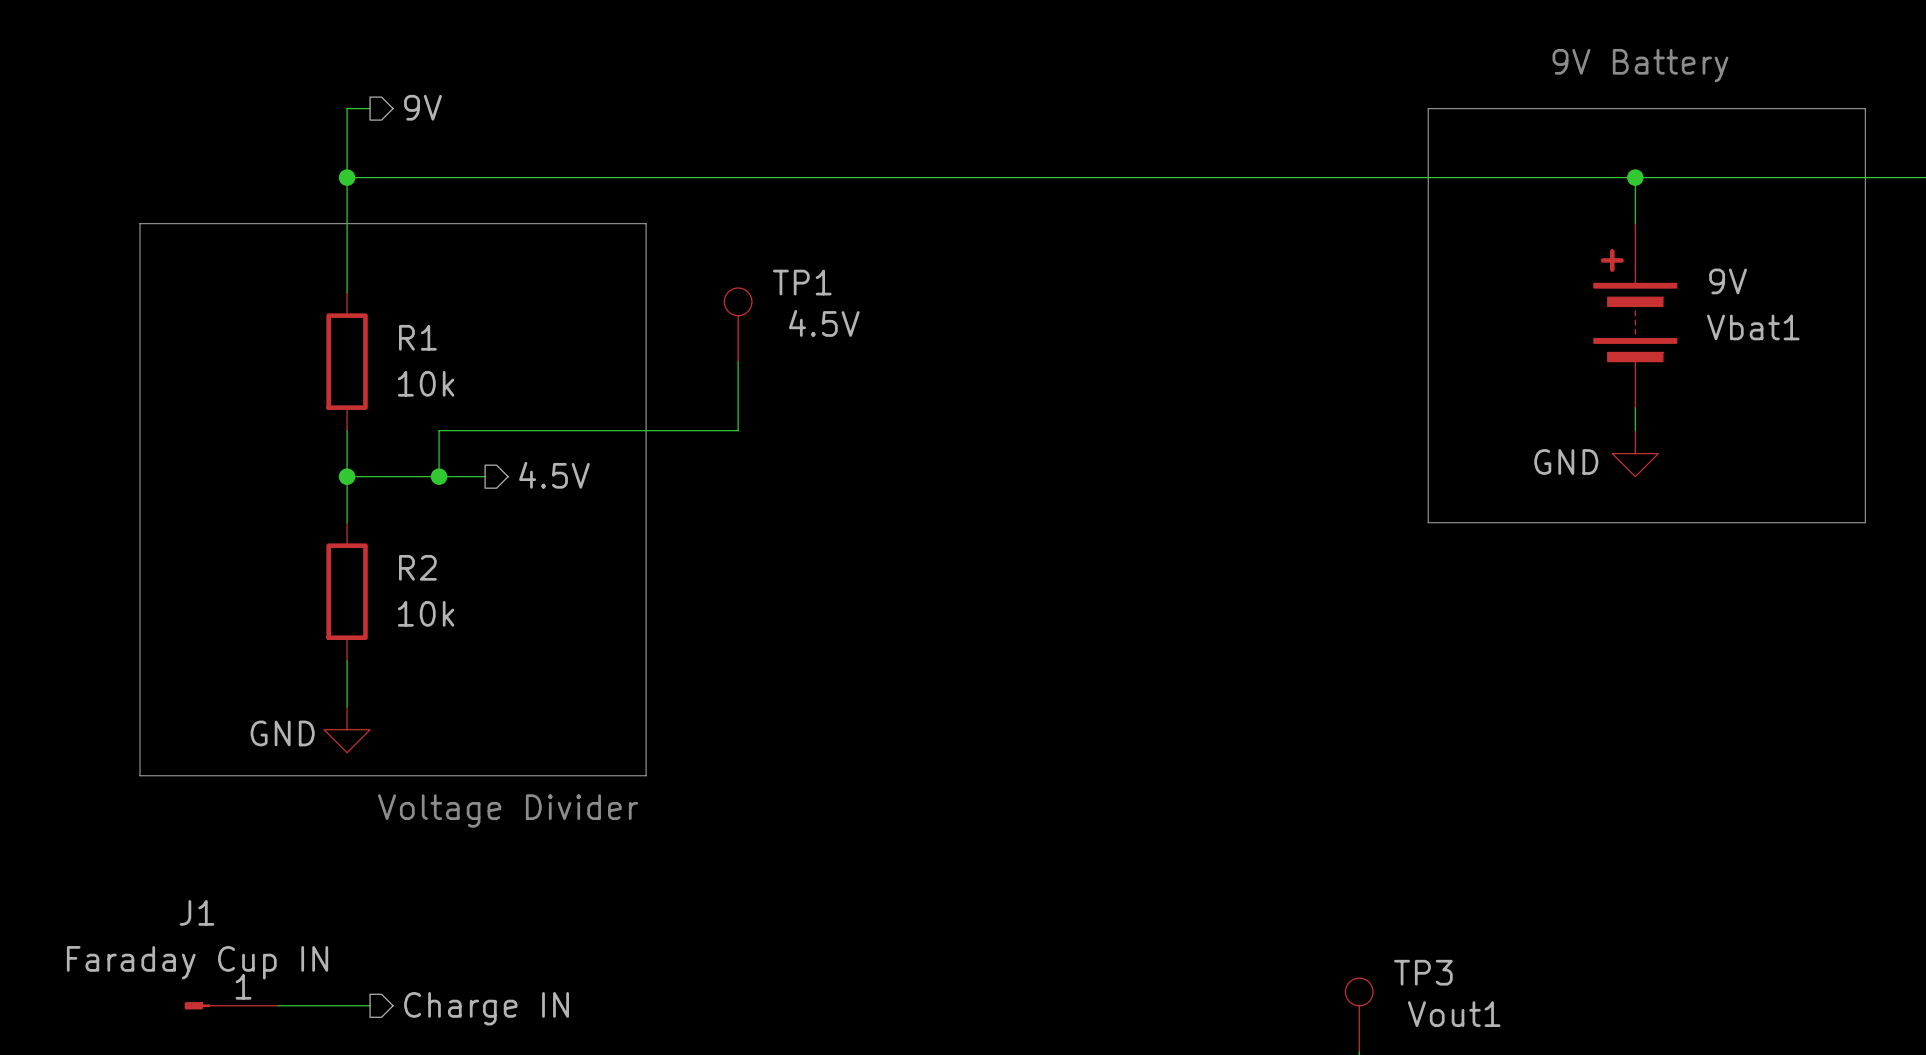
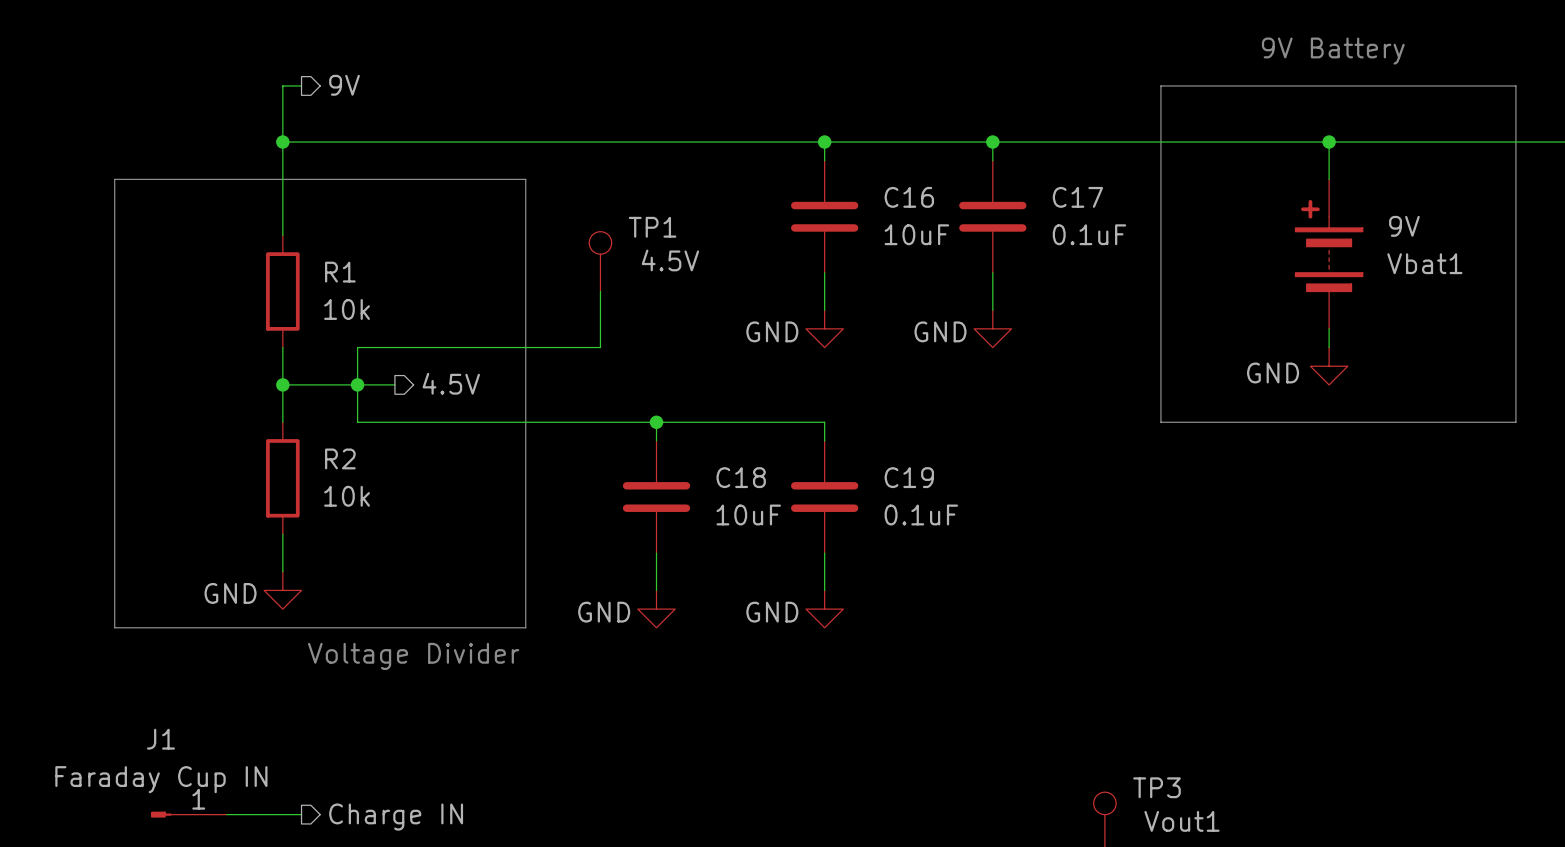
wire: none -> (824, 142) (824, 160)
junction: none -> (824, 142)
wire: none -> (992, 142) (992, 160)
junction: none -> (992, 142)
C16: none -> 10uF (824, 216)
C17: none -> 0.1uF (992, 216)
wire: none -> (824, 272) (824, 310)
wire: none -> (992, 272) (992, 310)
power symbol: none -> GND (824, 328)
power symbol: none -> GND (992, 328)
wire: none -> (357, 384) (357, 422) (824, 422) (824, 440)
wire: none -> (656, 422) (656, 440)
junction: none -> (656, 422)
C18: none -> 10uF (656, 497)
C19: none -> 0.1uF (824, 497)
wire: none -> (656, 553) (656, 590)
wire: none -> (824, 553) (824, 590)
power symbol: none -> GND (656, 609)
power symbol: none -> GND (824, 609)

